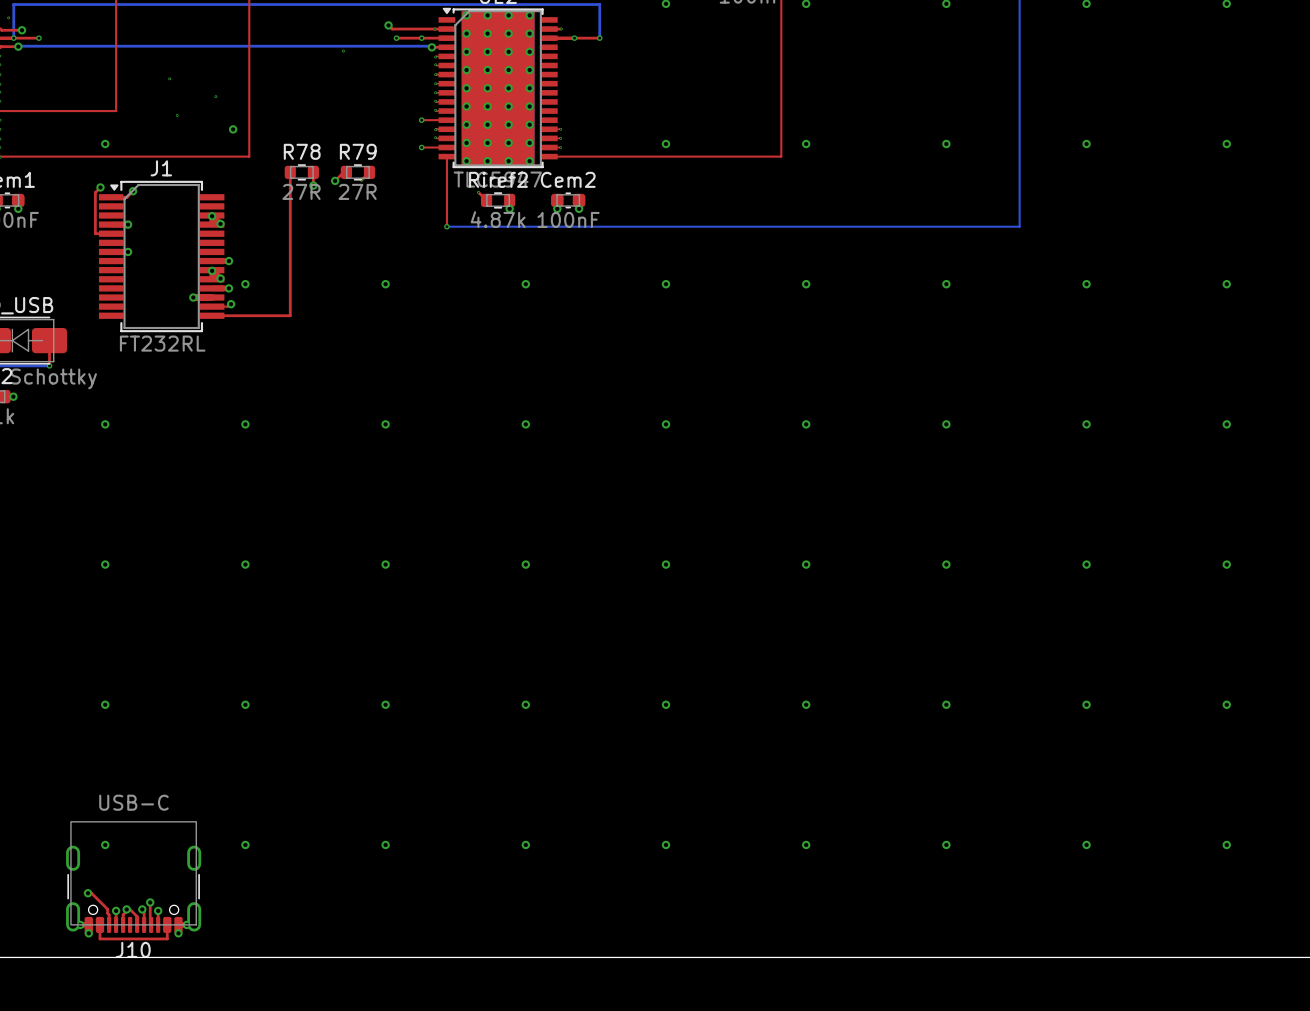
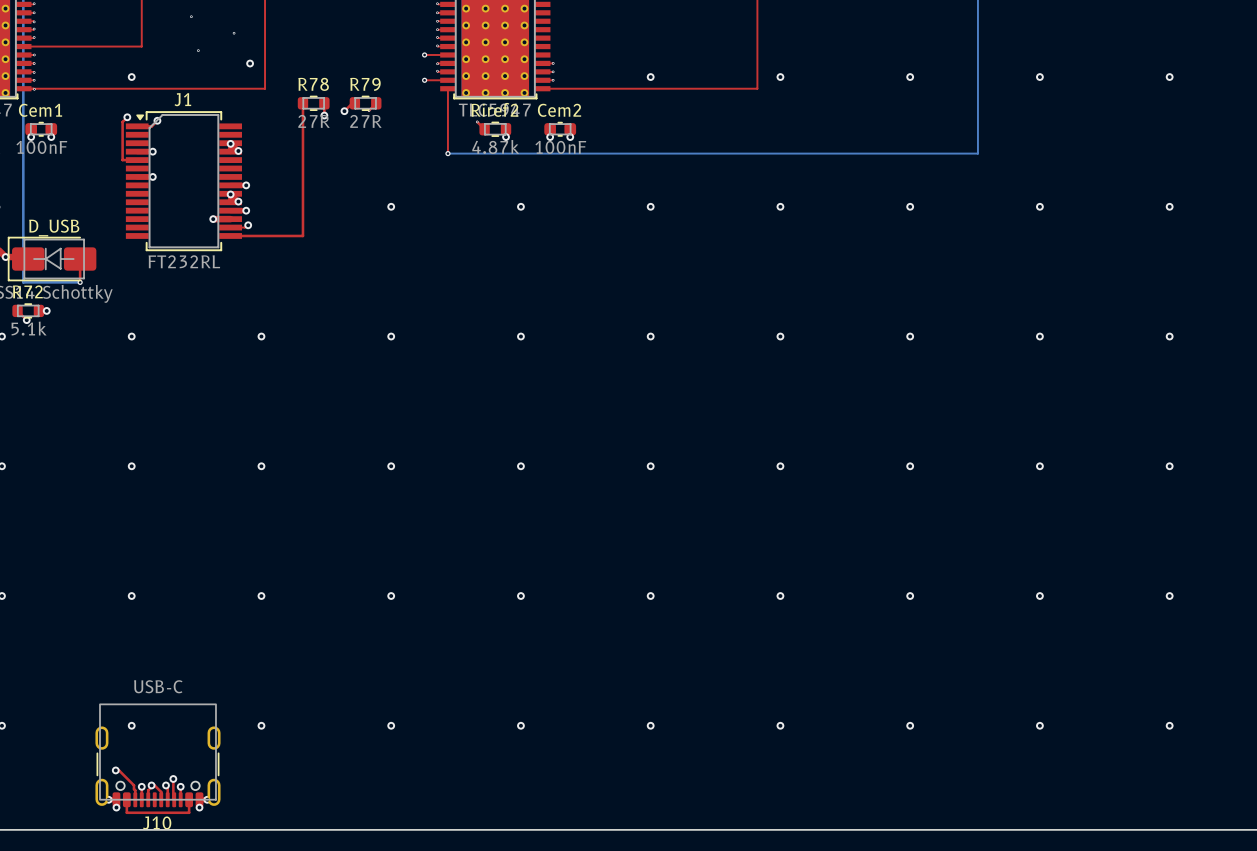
via: (245, 284) -> none

